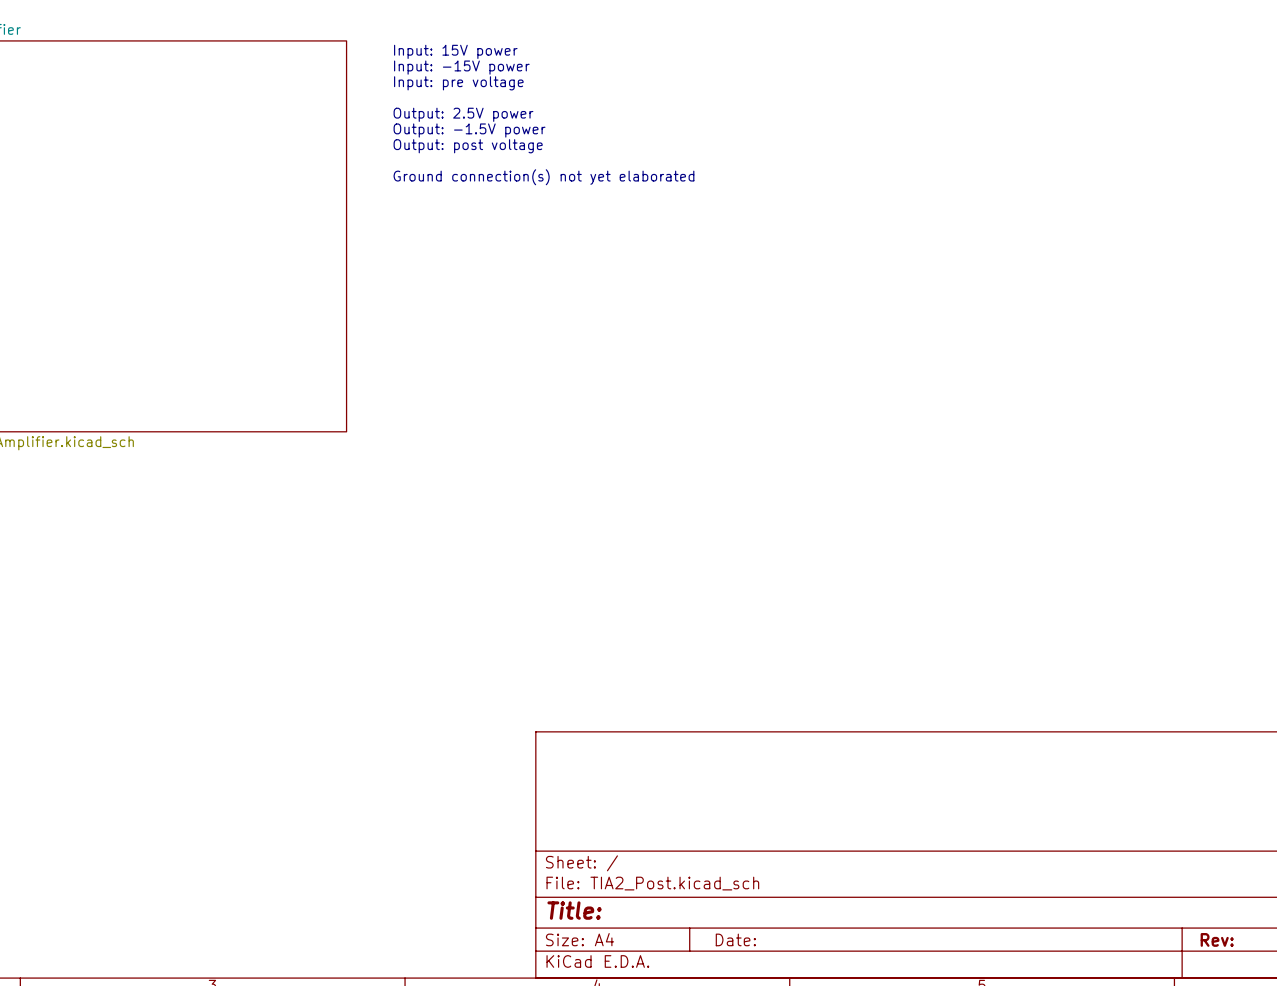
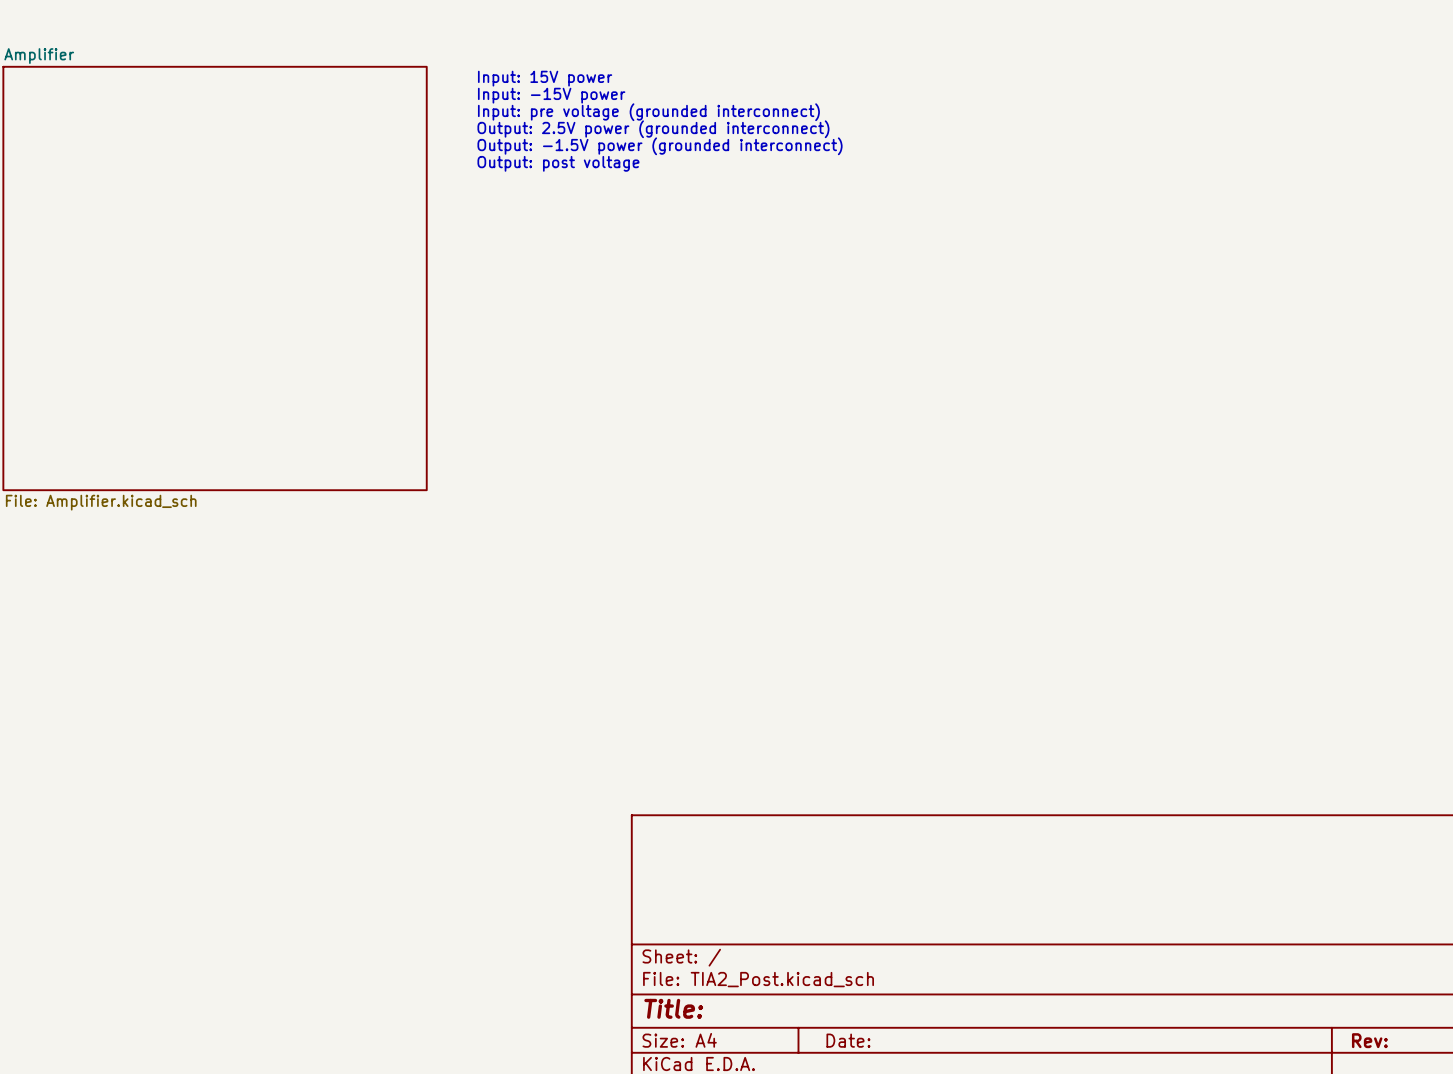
text: Input: pre voltage (458, 83) -> Input: pre voltage (grounded interconnect) (648, 112)
text: none -> Output: 2.5V power (grounded interconnect) (653, 129)
text: Output: 2.5V power (463, 114) -> Output: -1.5V power (grounded interconnect) (660, 146)
text: Output: -1.5V power (469, 130) -> Output: post voltage (558, 163)
text: Output: post voltage (468, 146) -> none
text: Ground connection(s) not yet elaborated (543, 177) -> none

